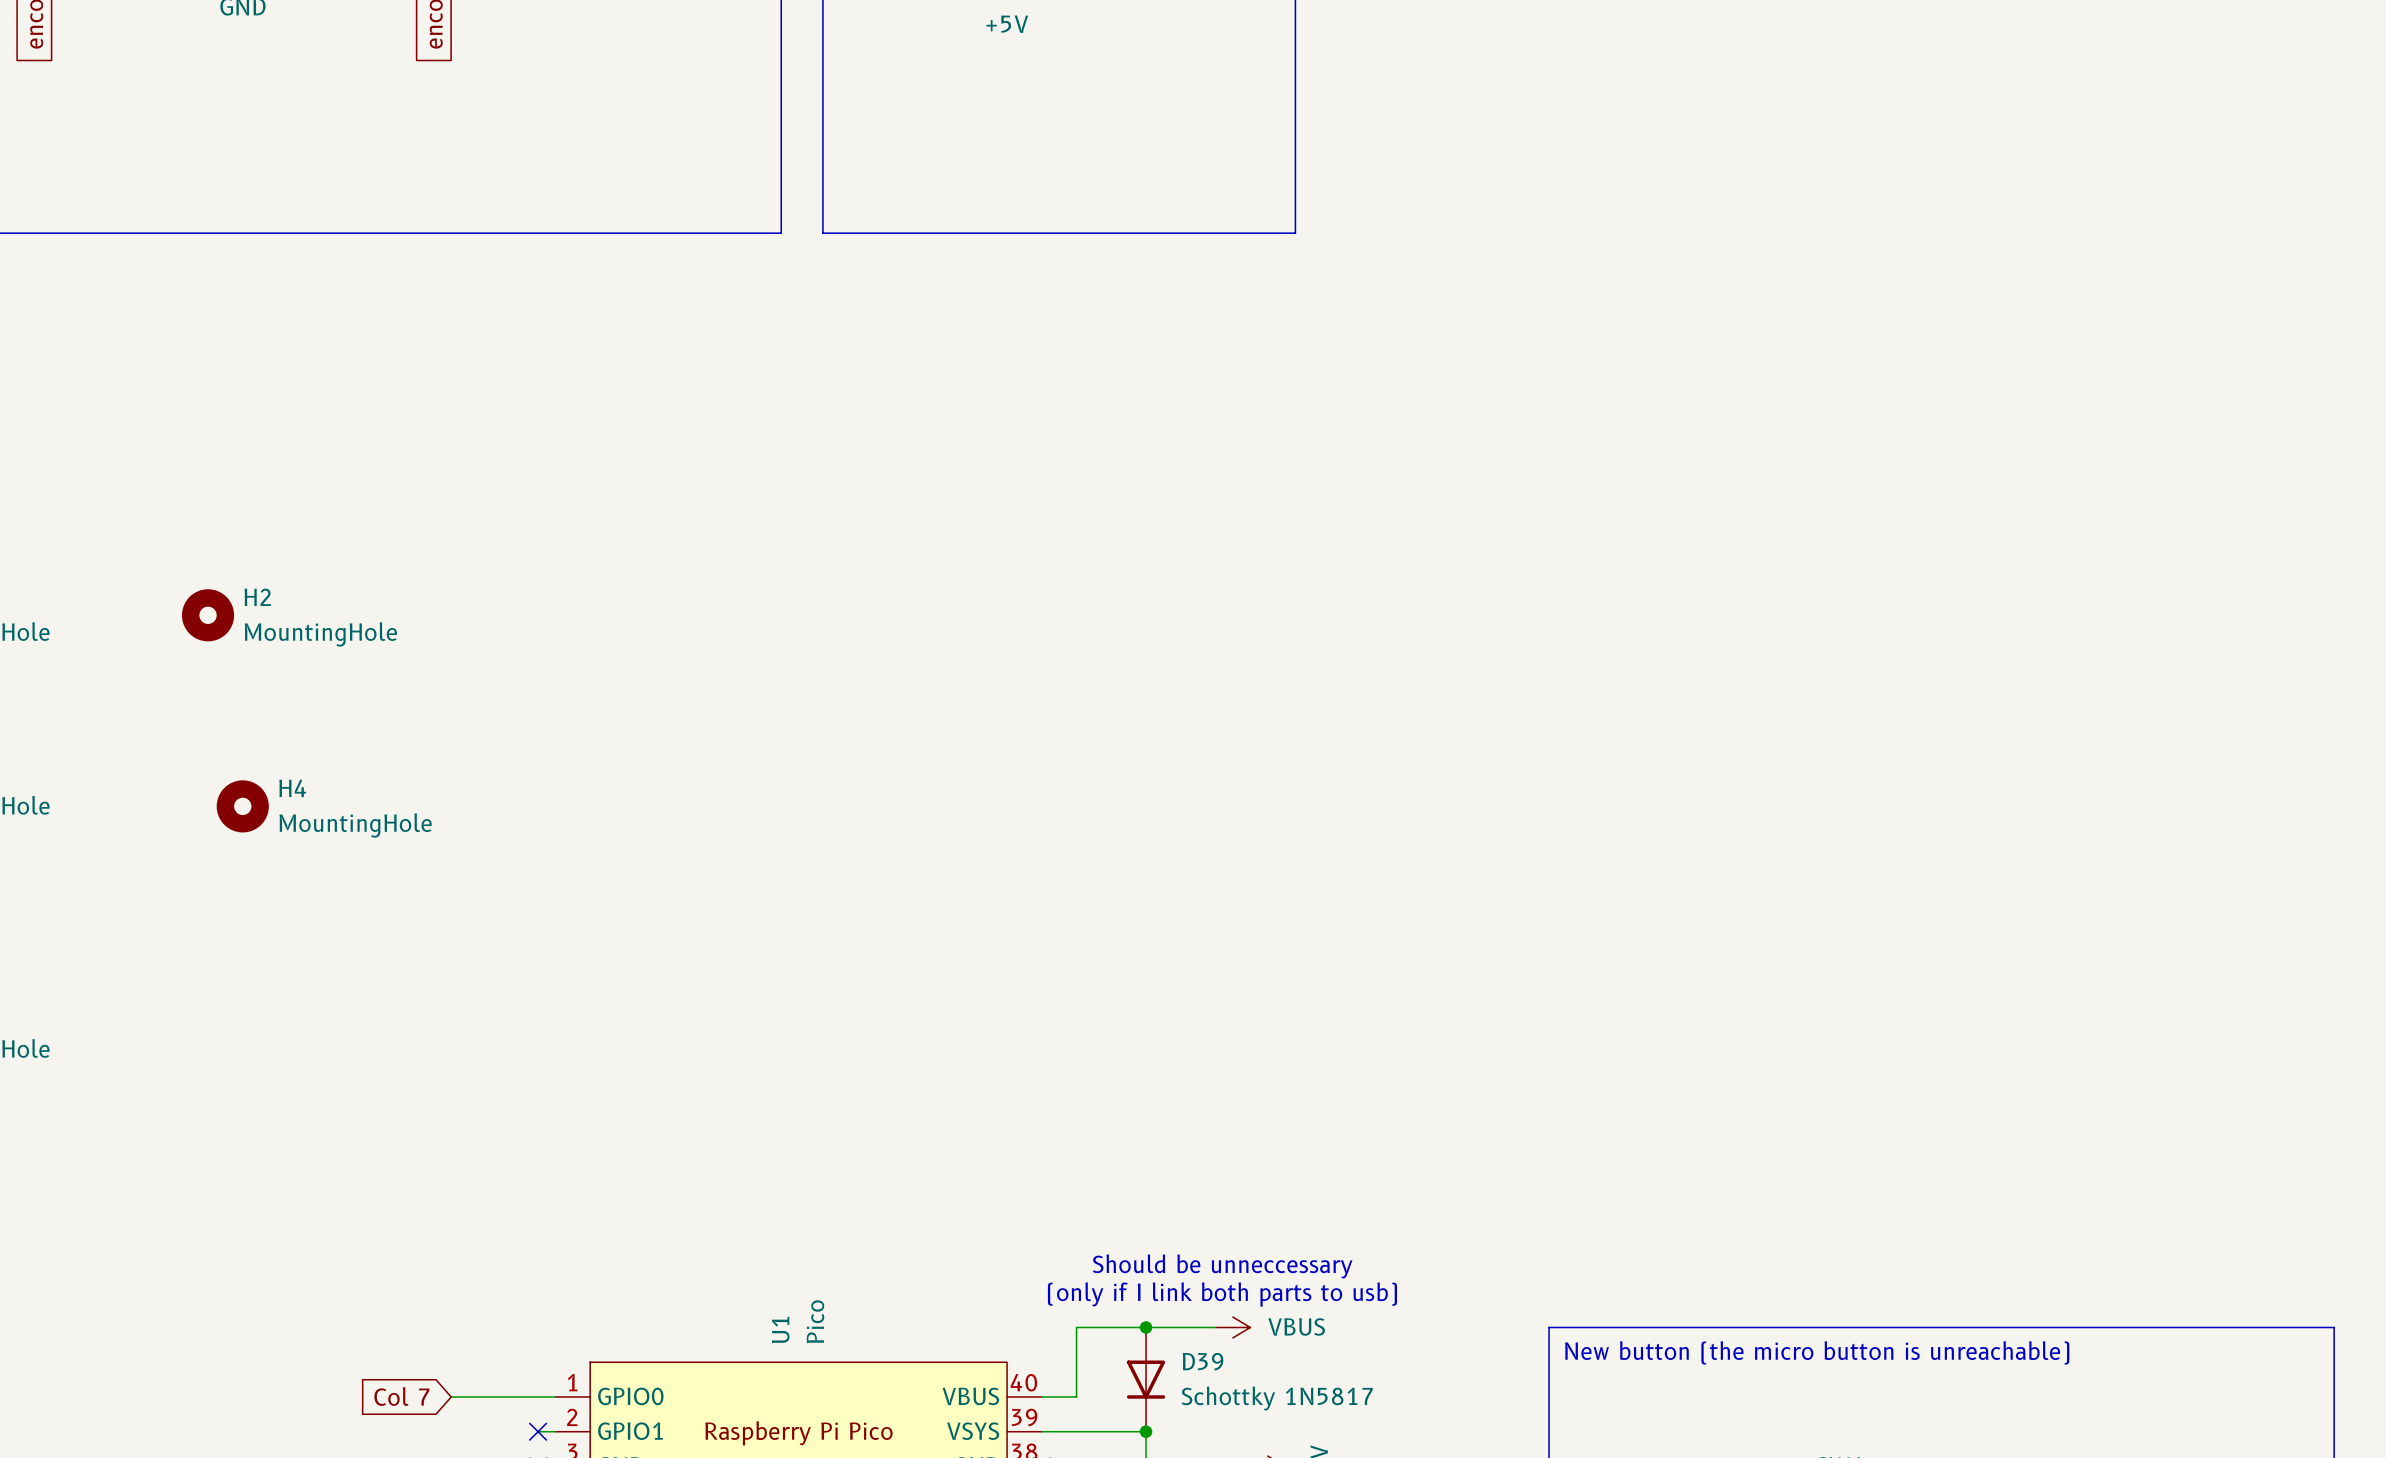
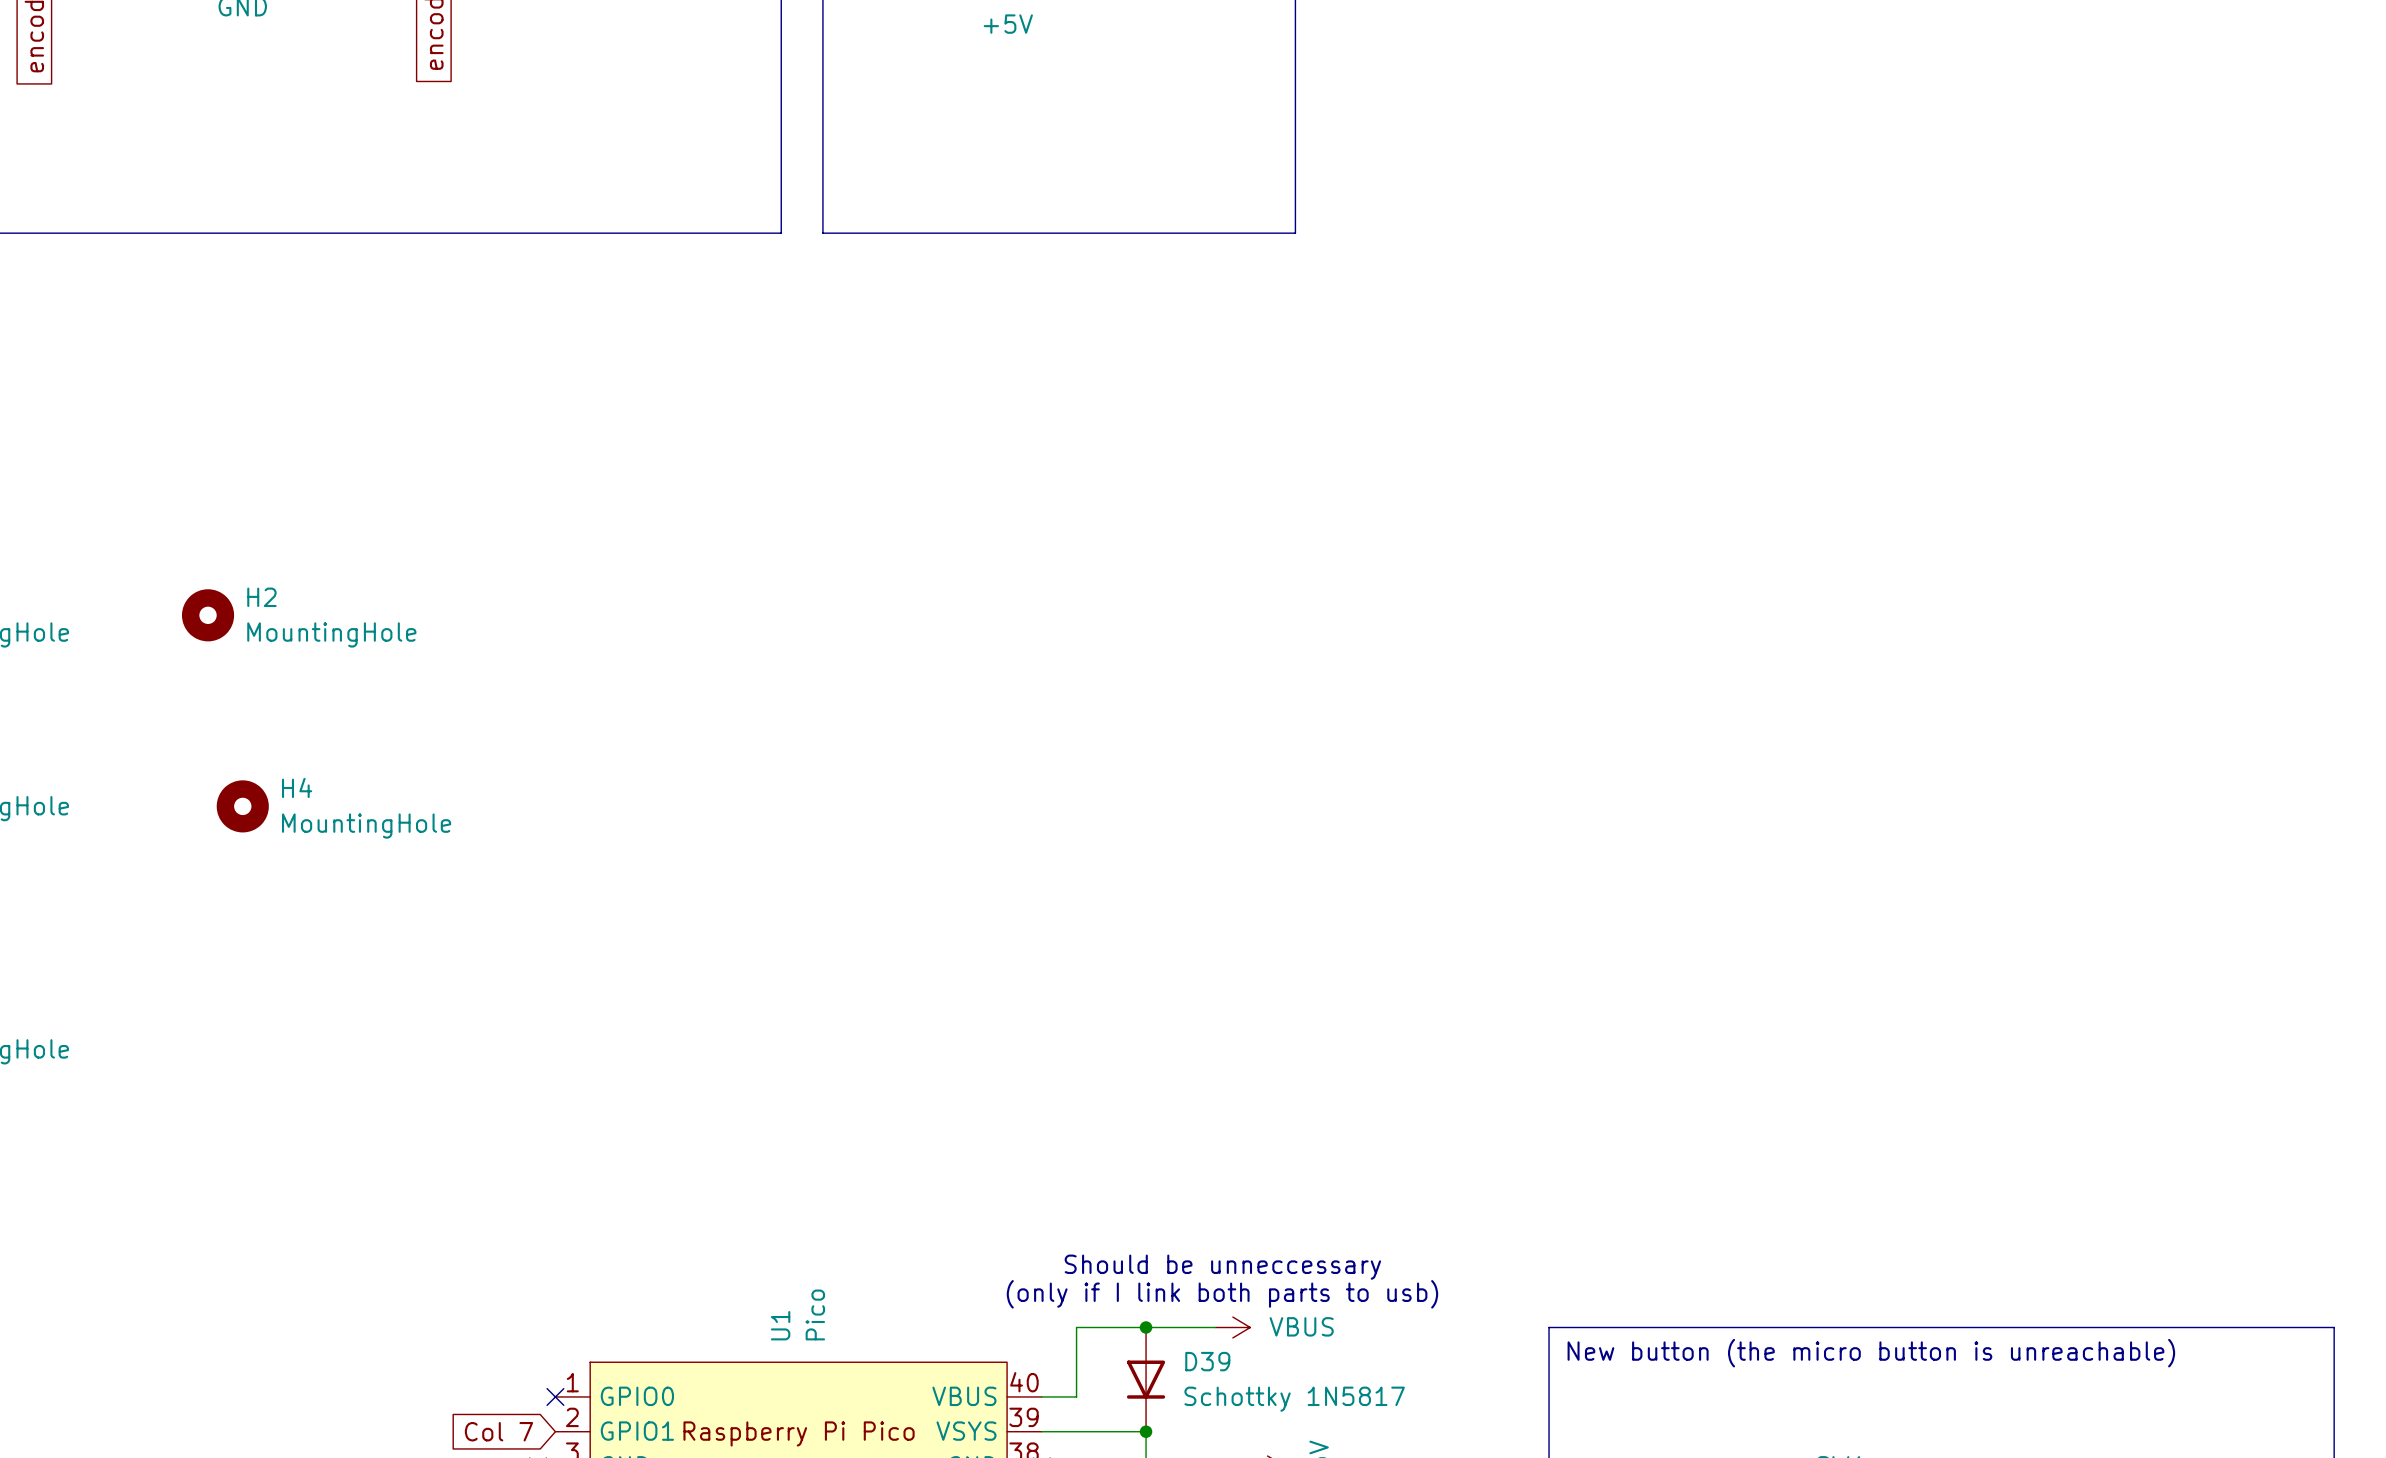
global label position: Col 7 (401, 1396) -> Col 7 (498, 1431)
wire: (451, 1396) (555, 1396) -> none
wire: (538, 1431) (555, 1431) -> none
no-connect mark position: (538, 1431) -> (555, 1396)

